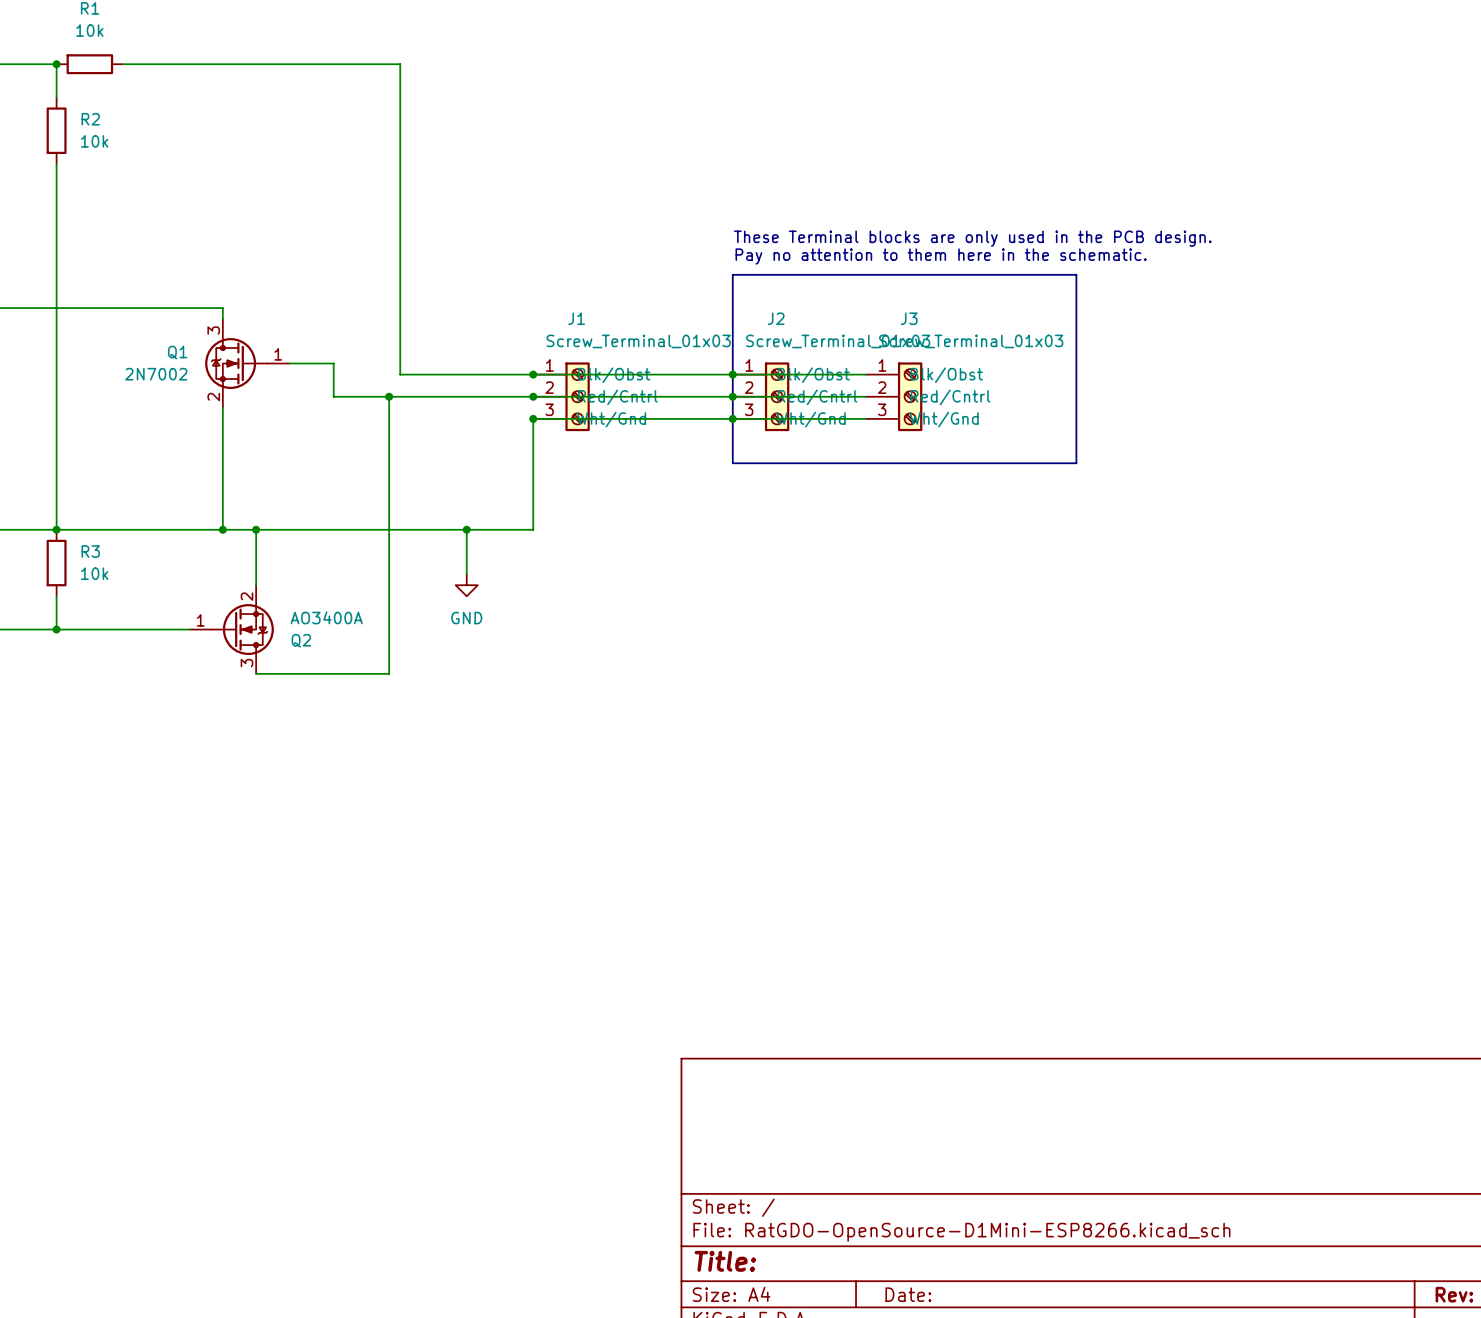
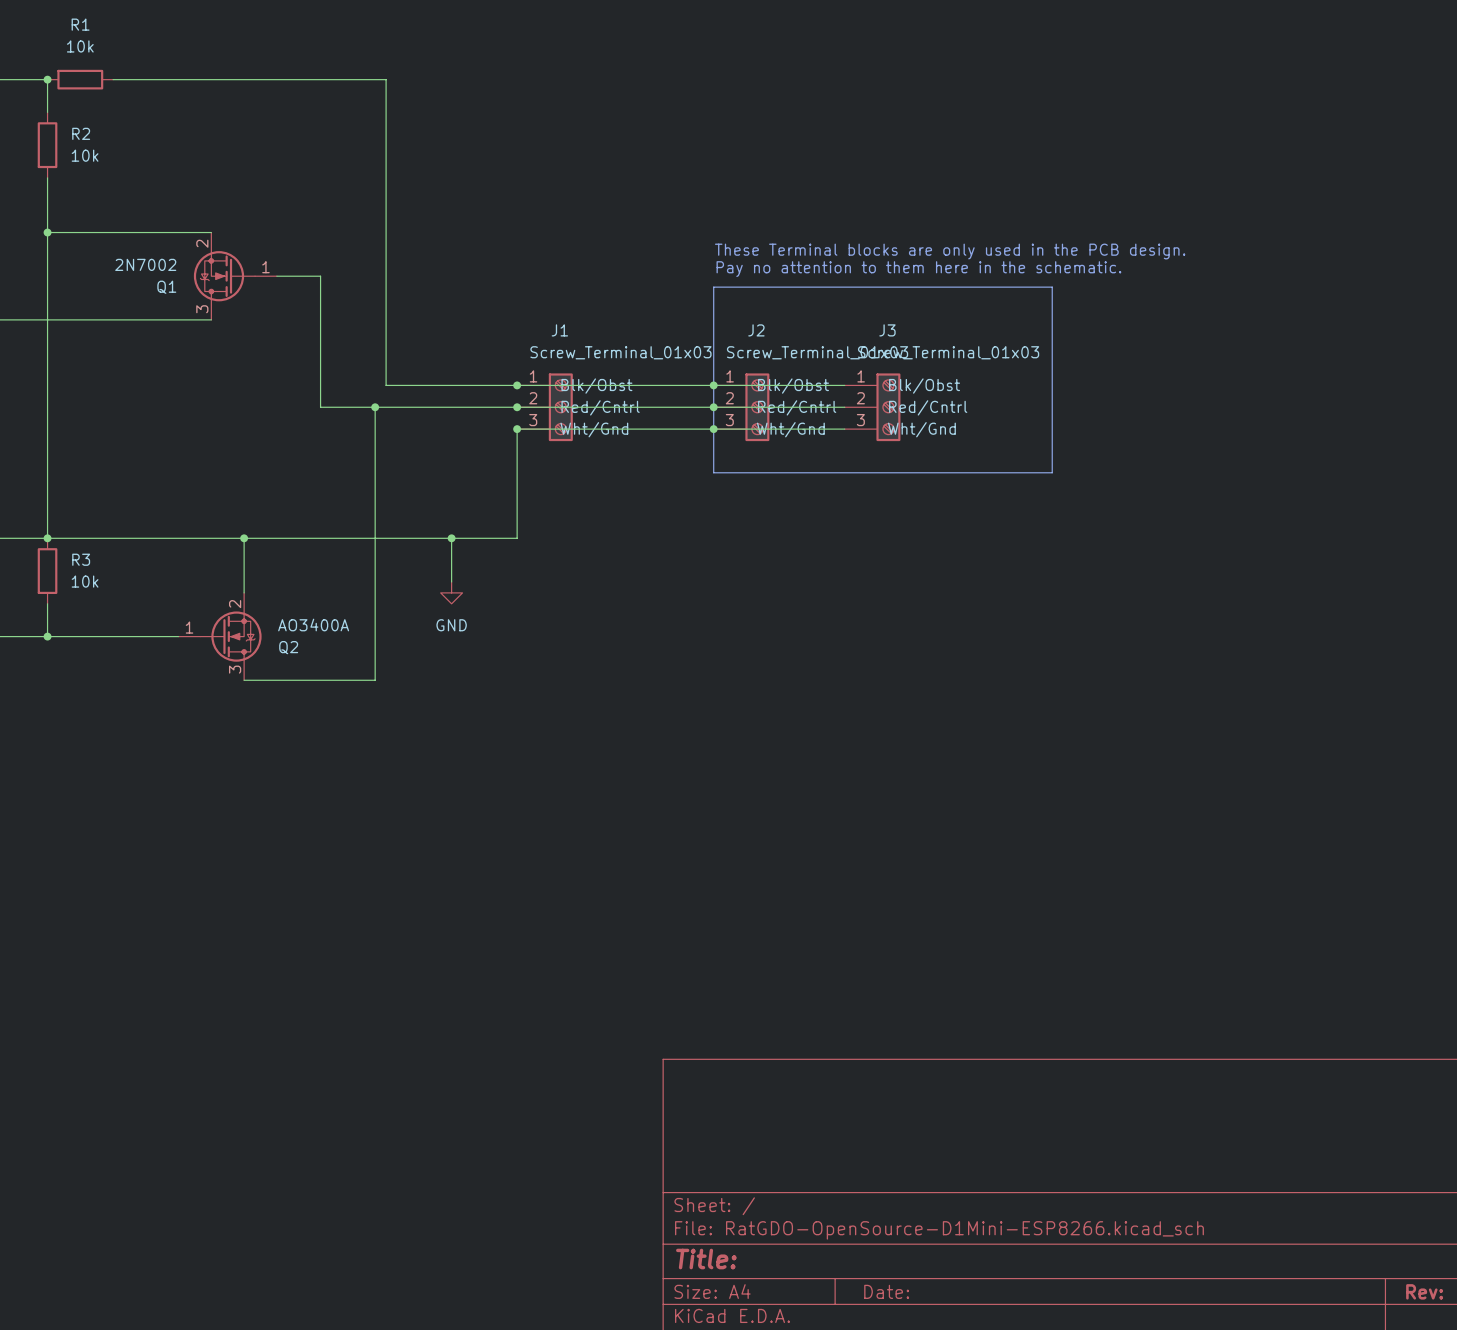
wire: none -> (47, 232) (211, 232)
junction: none -> (47, 232)
wire: (222, 308) (222, 319) -> none
Q1 flip: as is (236, 363) -> up-down (224, 276)
Q1 position: (247, 363) -> (235, 276)
wire: (289, 363) (333, 363) -> (276, 276) (320, 276) (320, 374)
wire: (222, 407) (222, 529) -> none
junction: (222, 529) -> none

